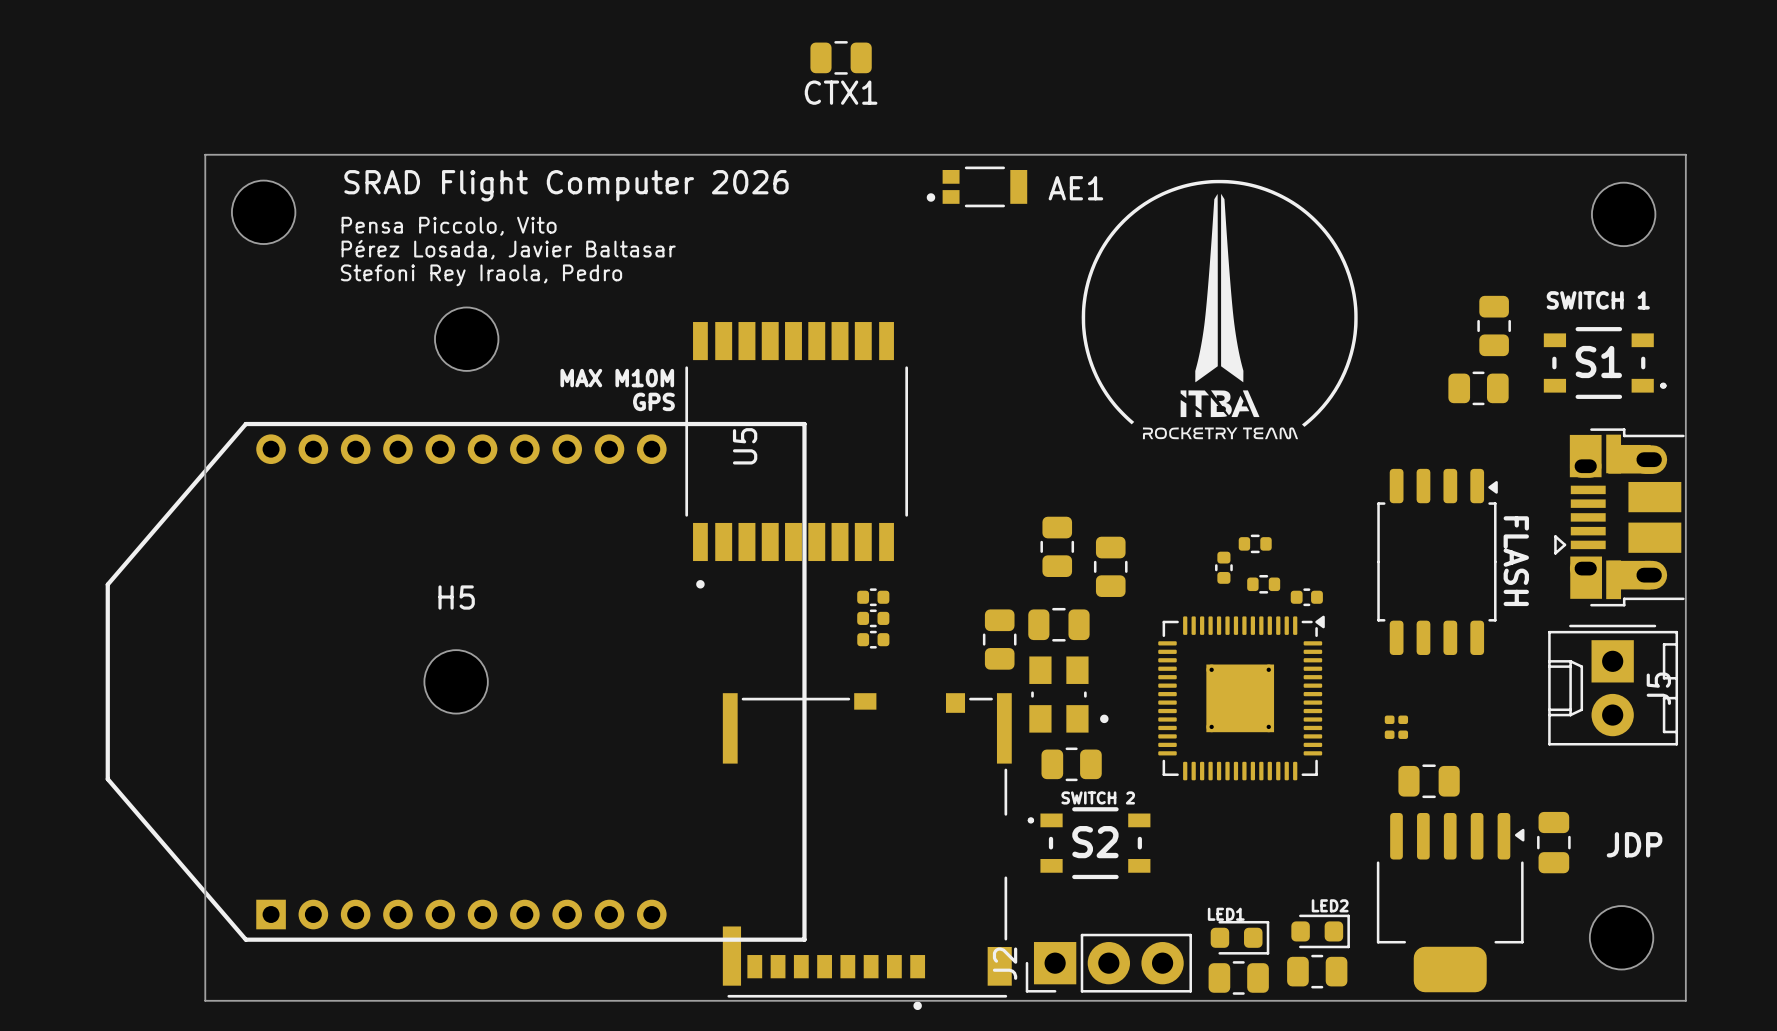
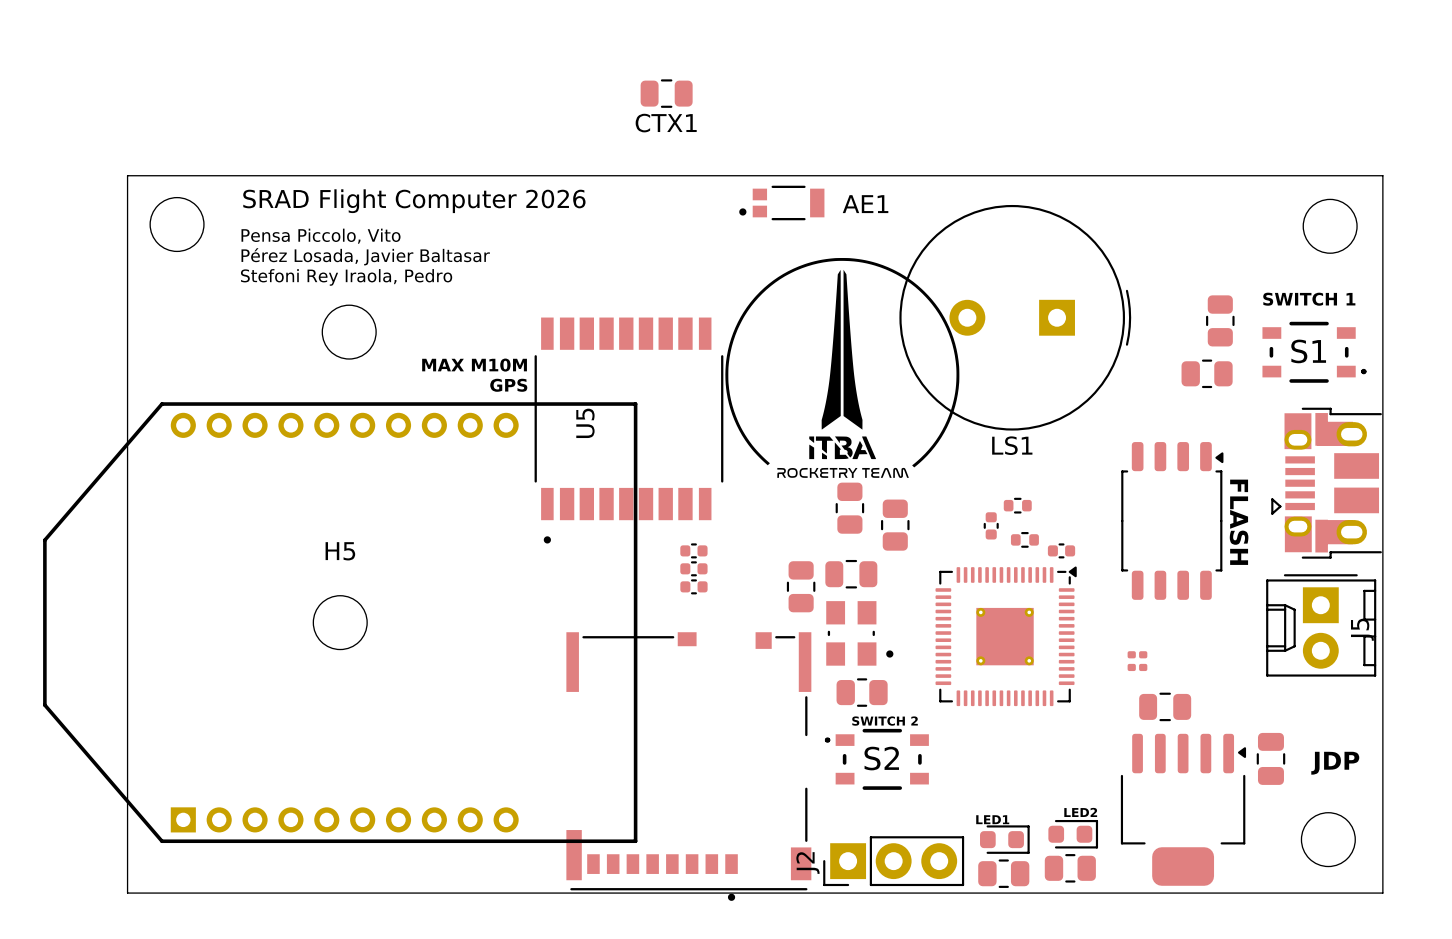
drawing position: (1219, 309) -> (842, 367)
LS1: none -> (1015, 317)

